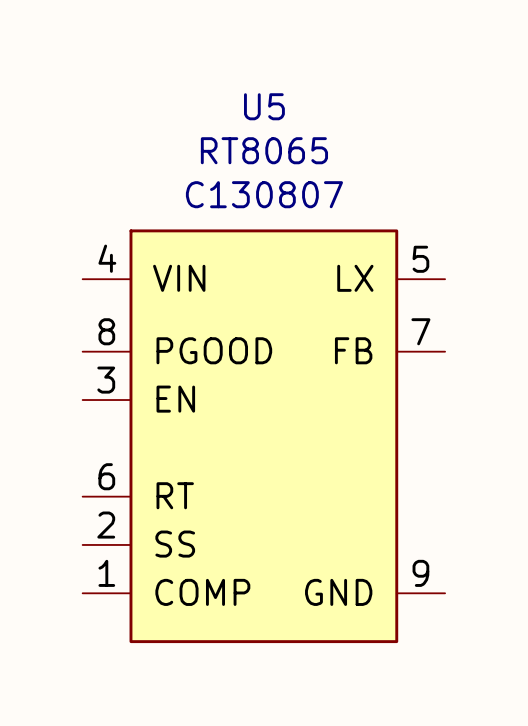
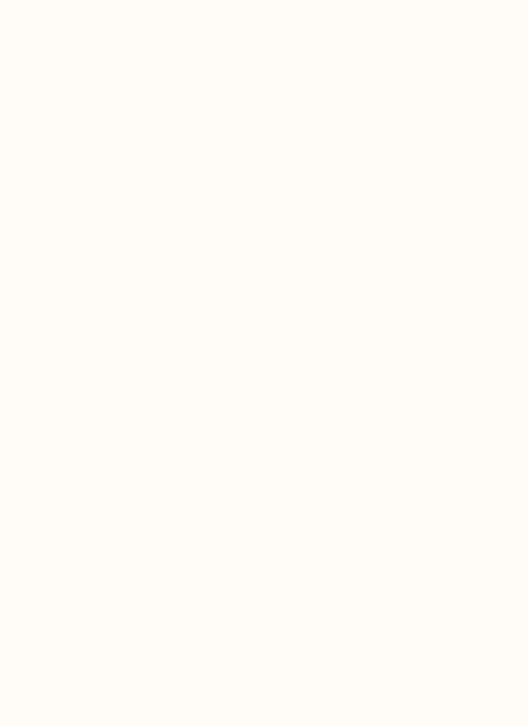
U5: RT8065 (263, 436) -> none

